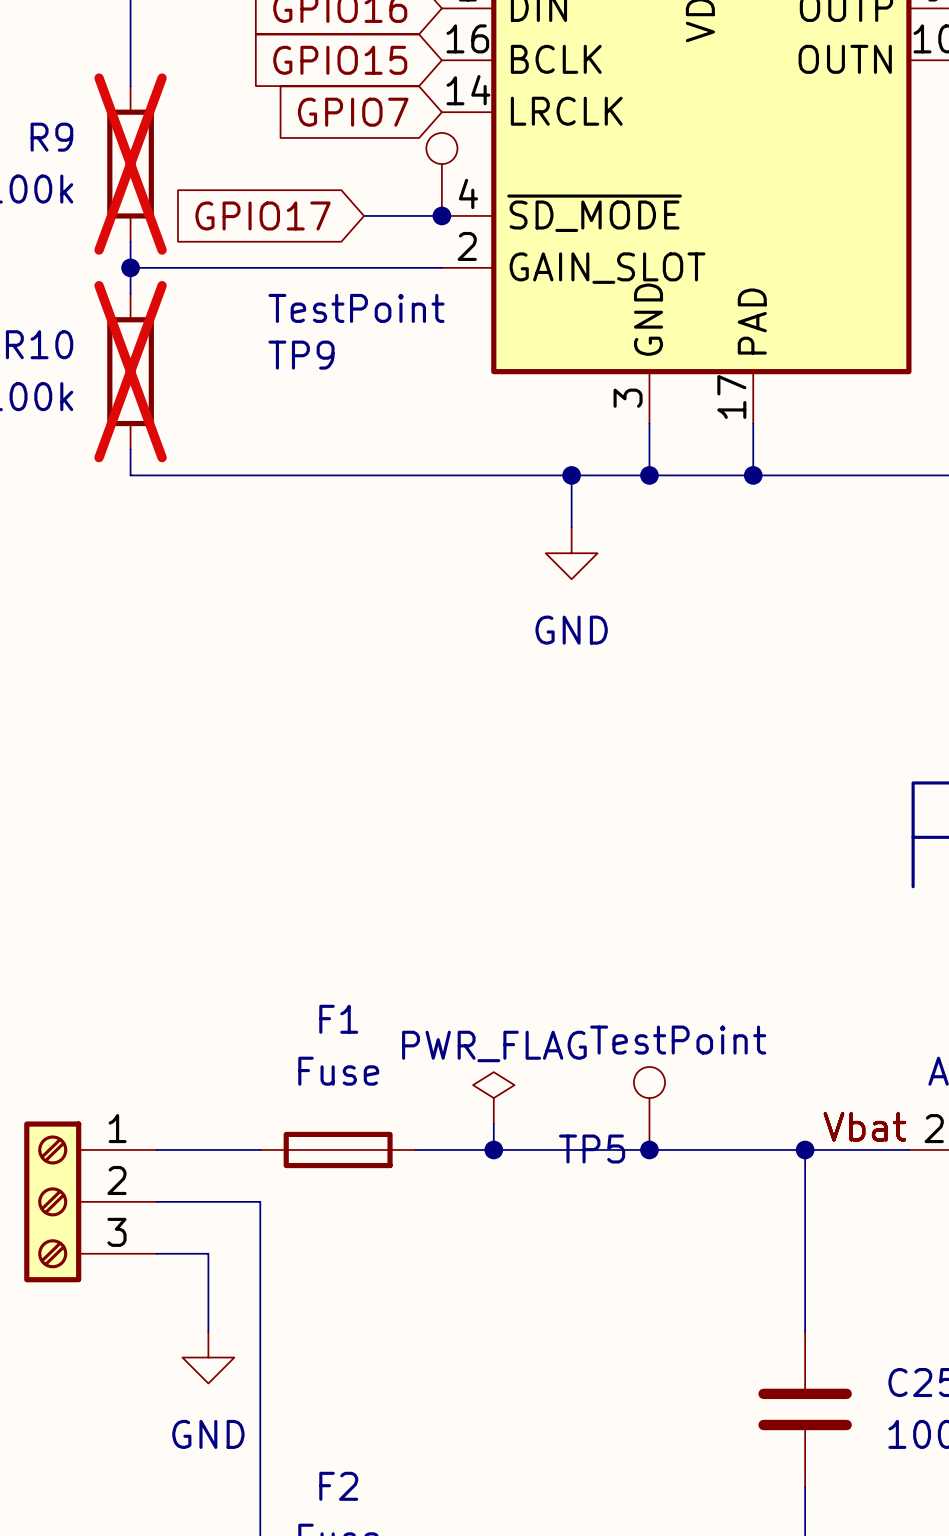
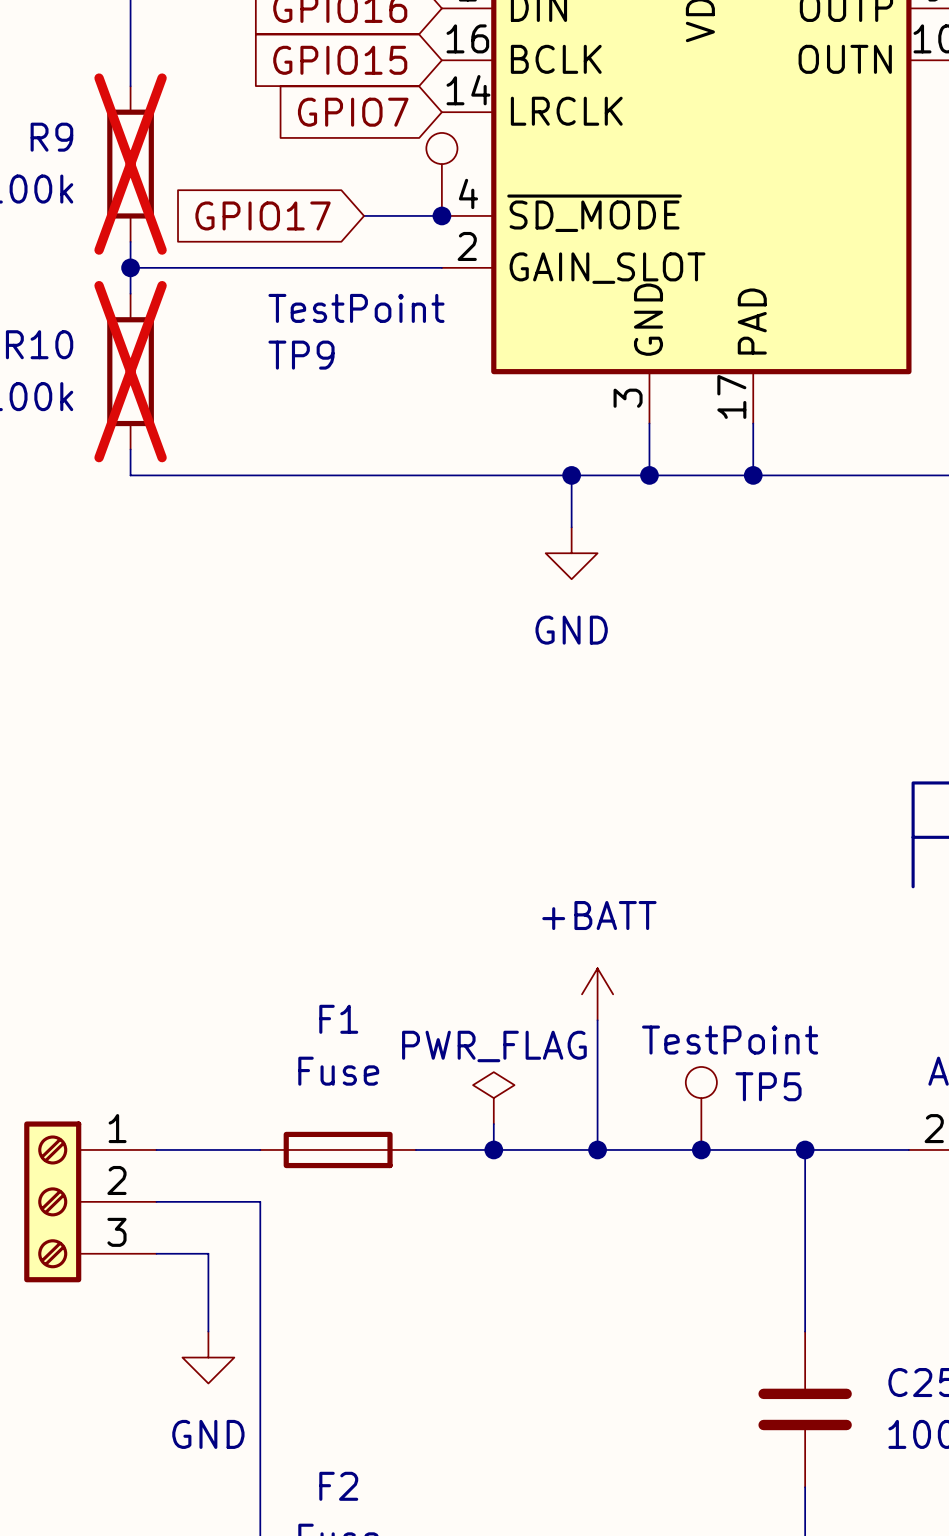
power symbol: none -> +BATT (597, 994)
wire: none -> (597, 1020) (597, 1149)
TP5 position: (649, 1108) -> (701, 1108)
label: Vbat (864, 1126) -> none
TP5 name position: TP5 (592, 1149) -> TP5 (768, 1086)
junction: none -> (597, 1149)
junction: (649, 1149) -> none
junction: none -> (701, 1149)

